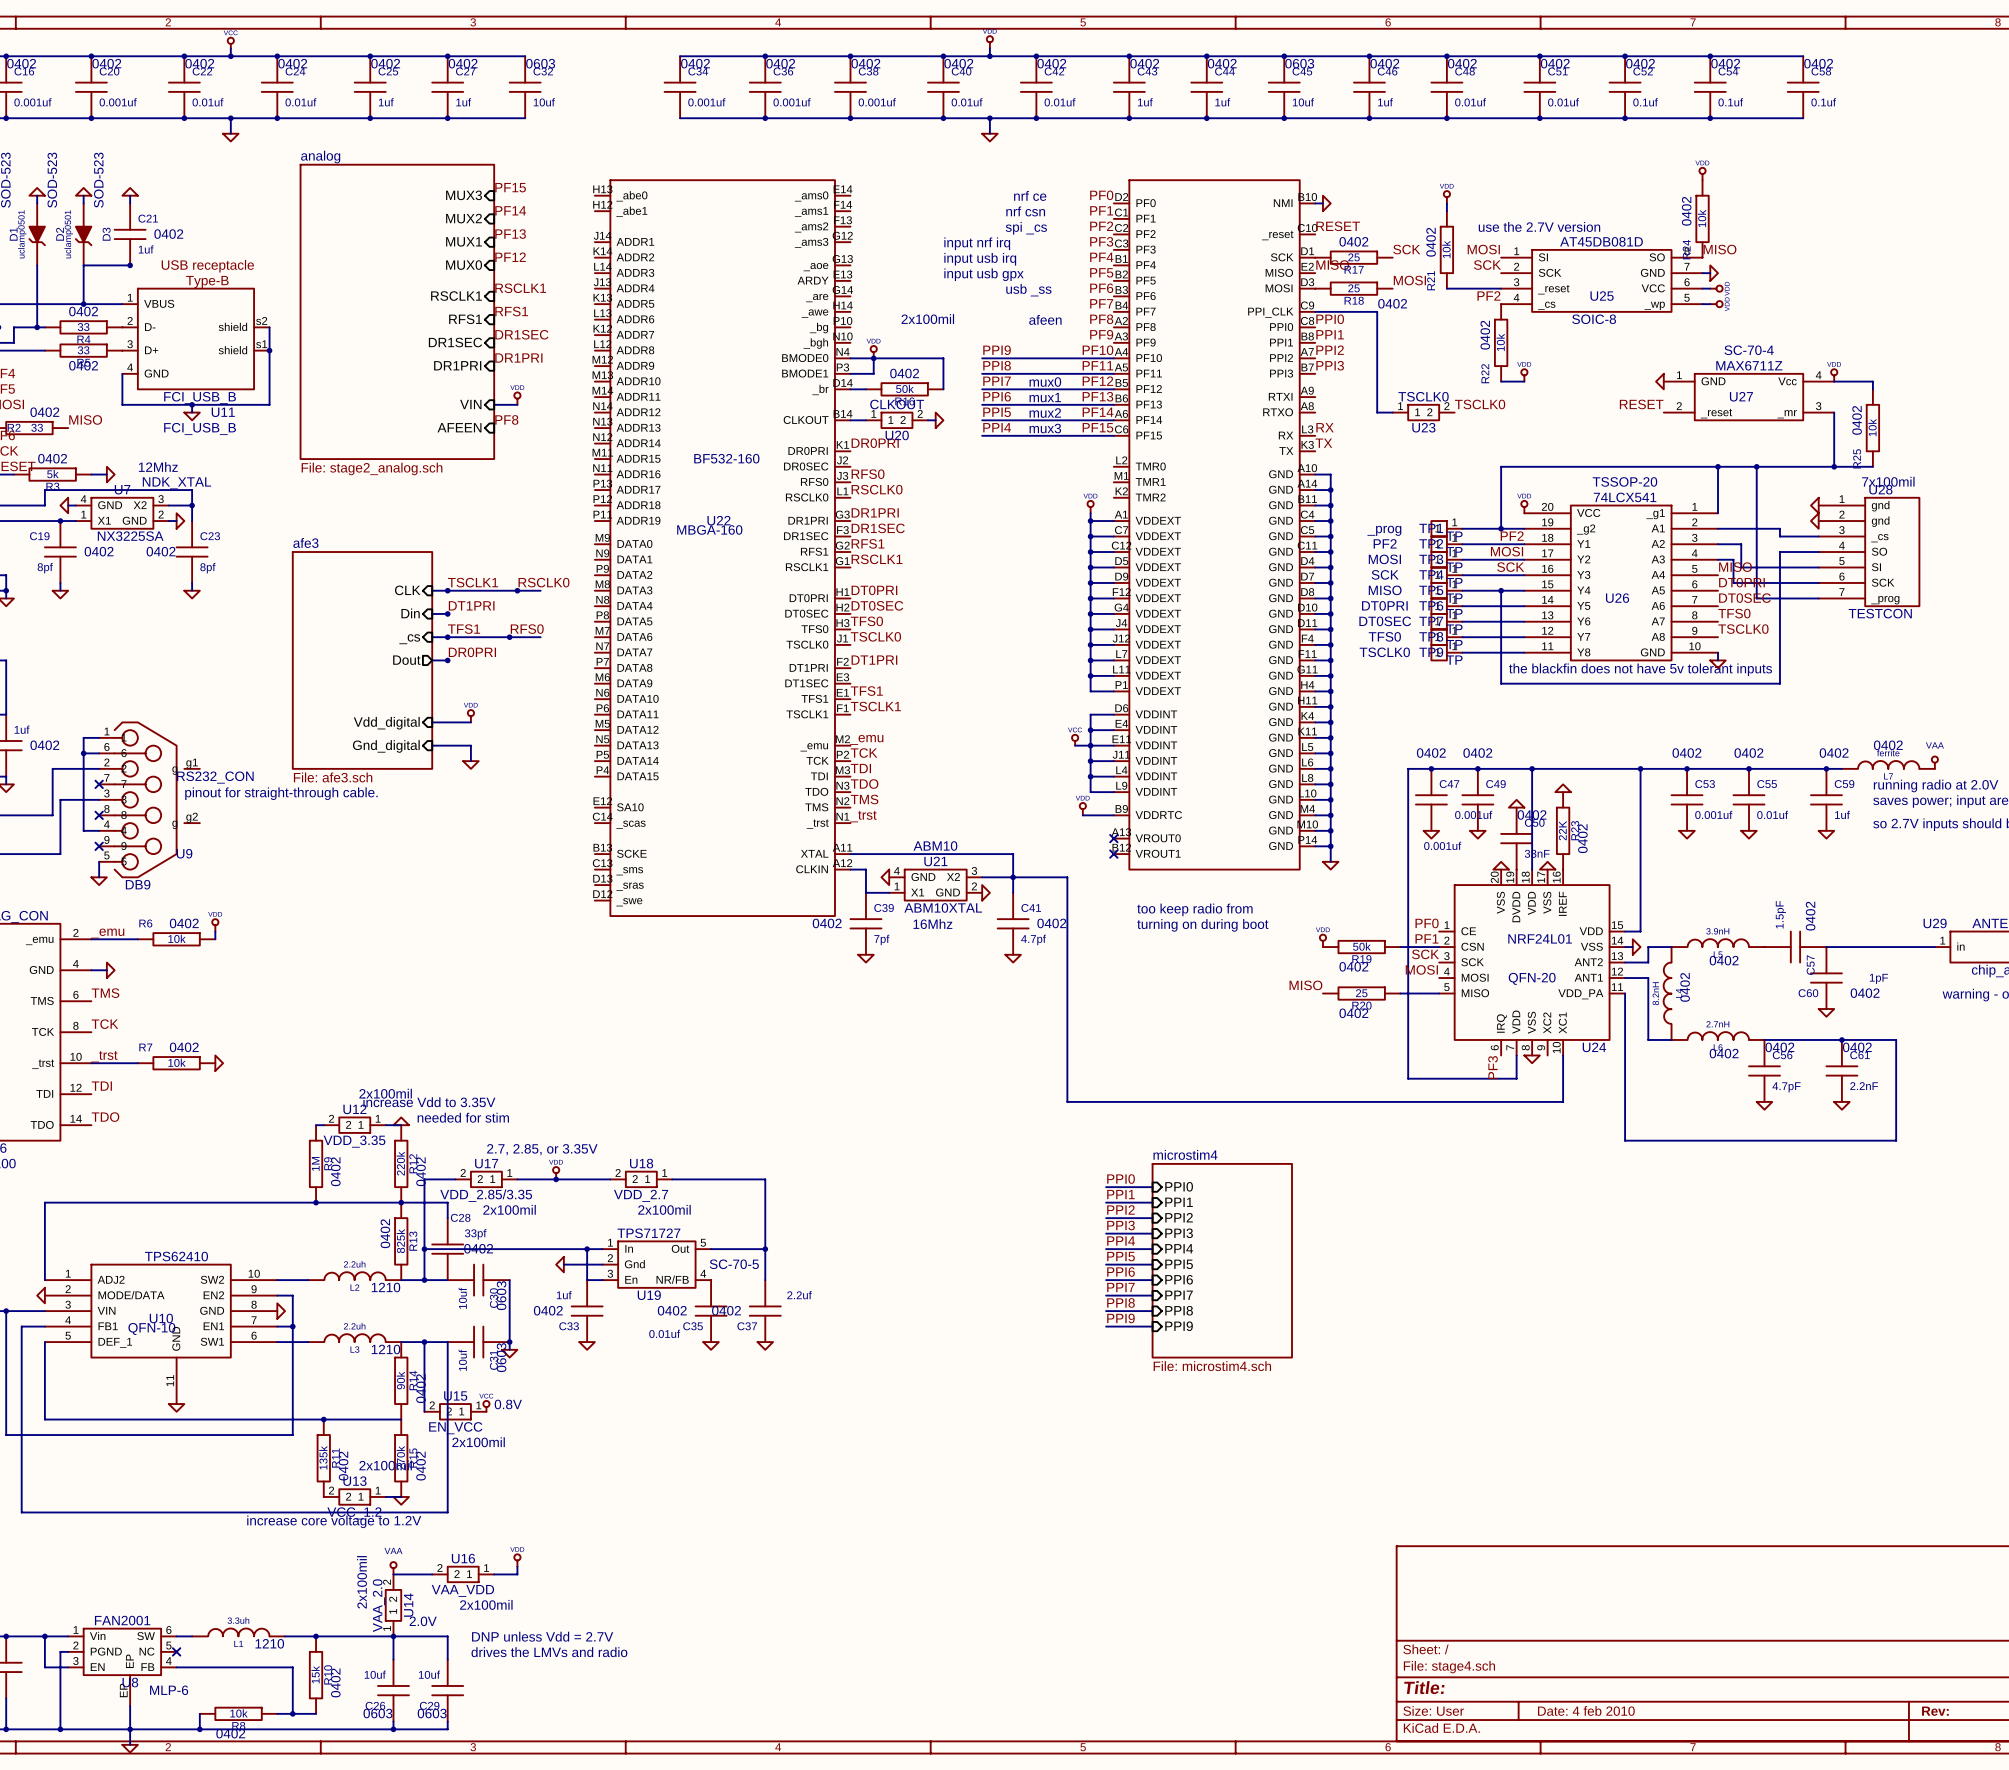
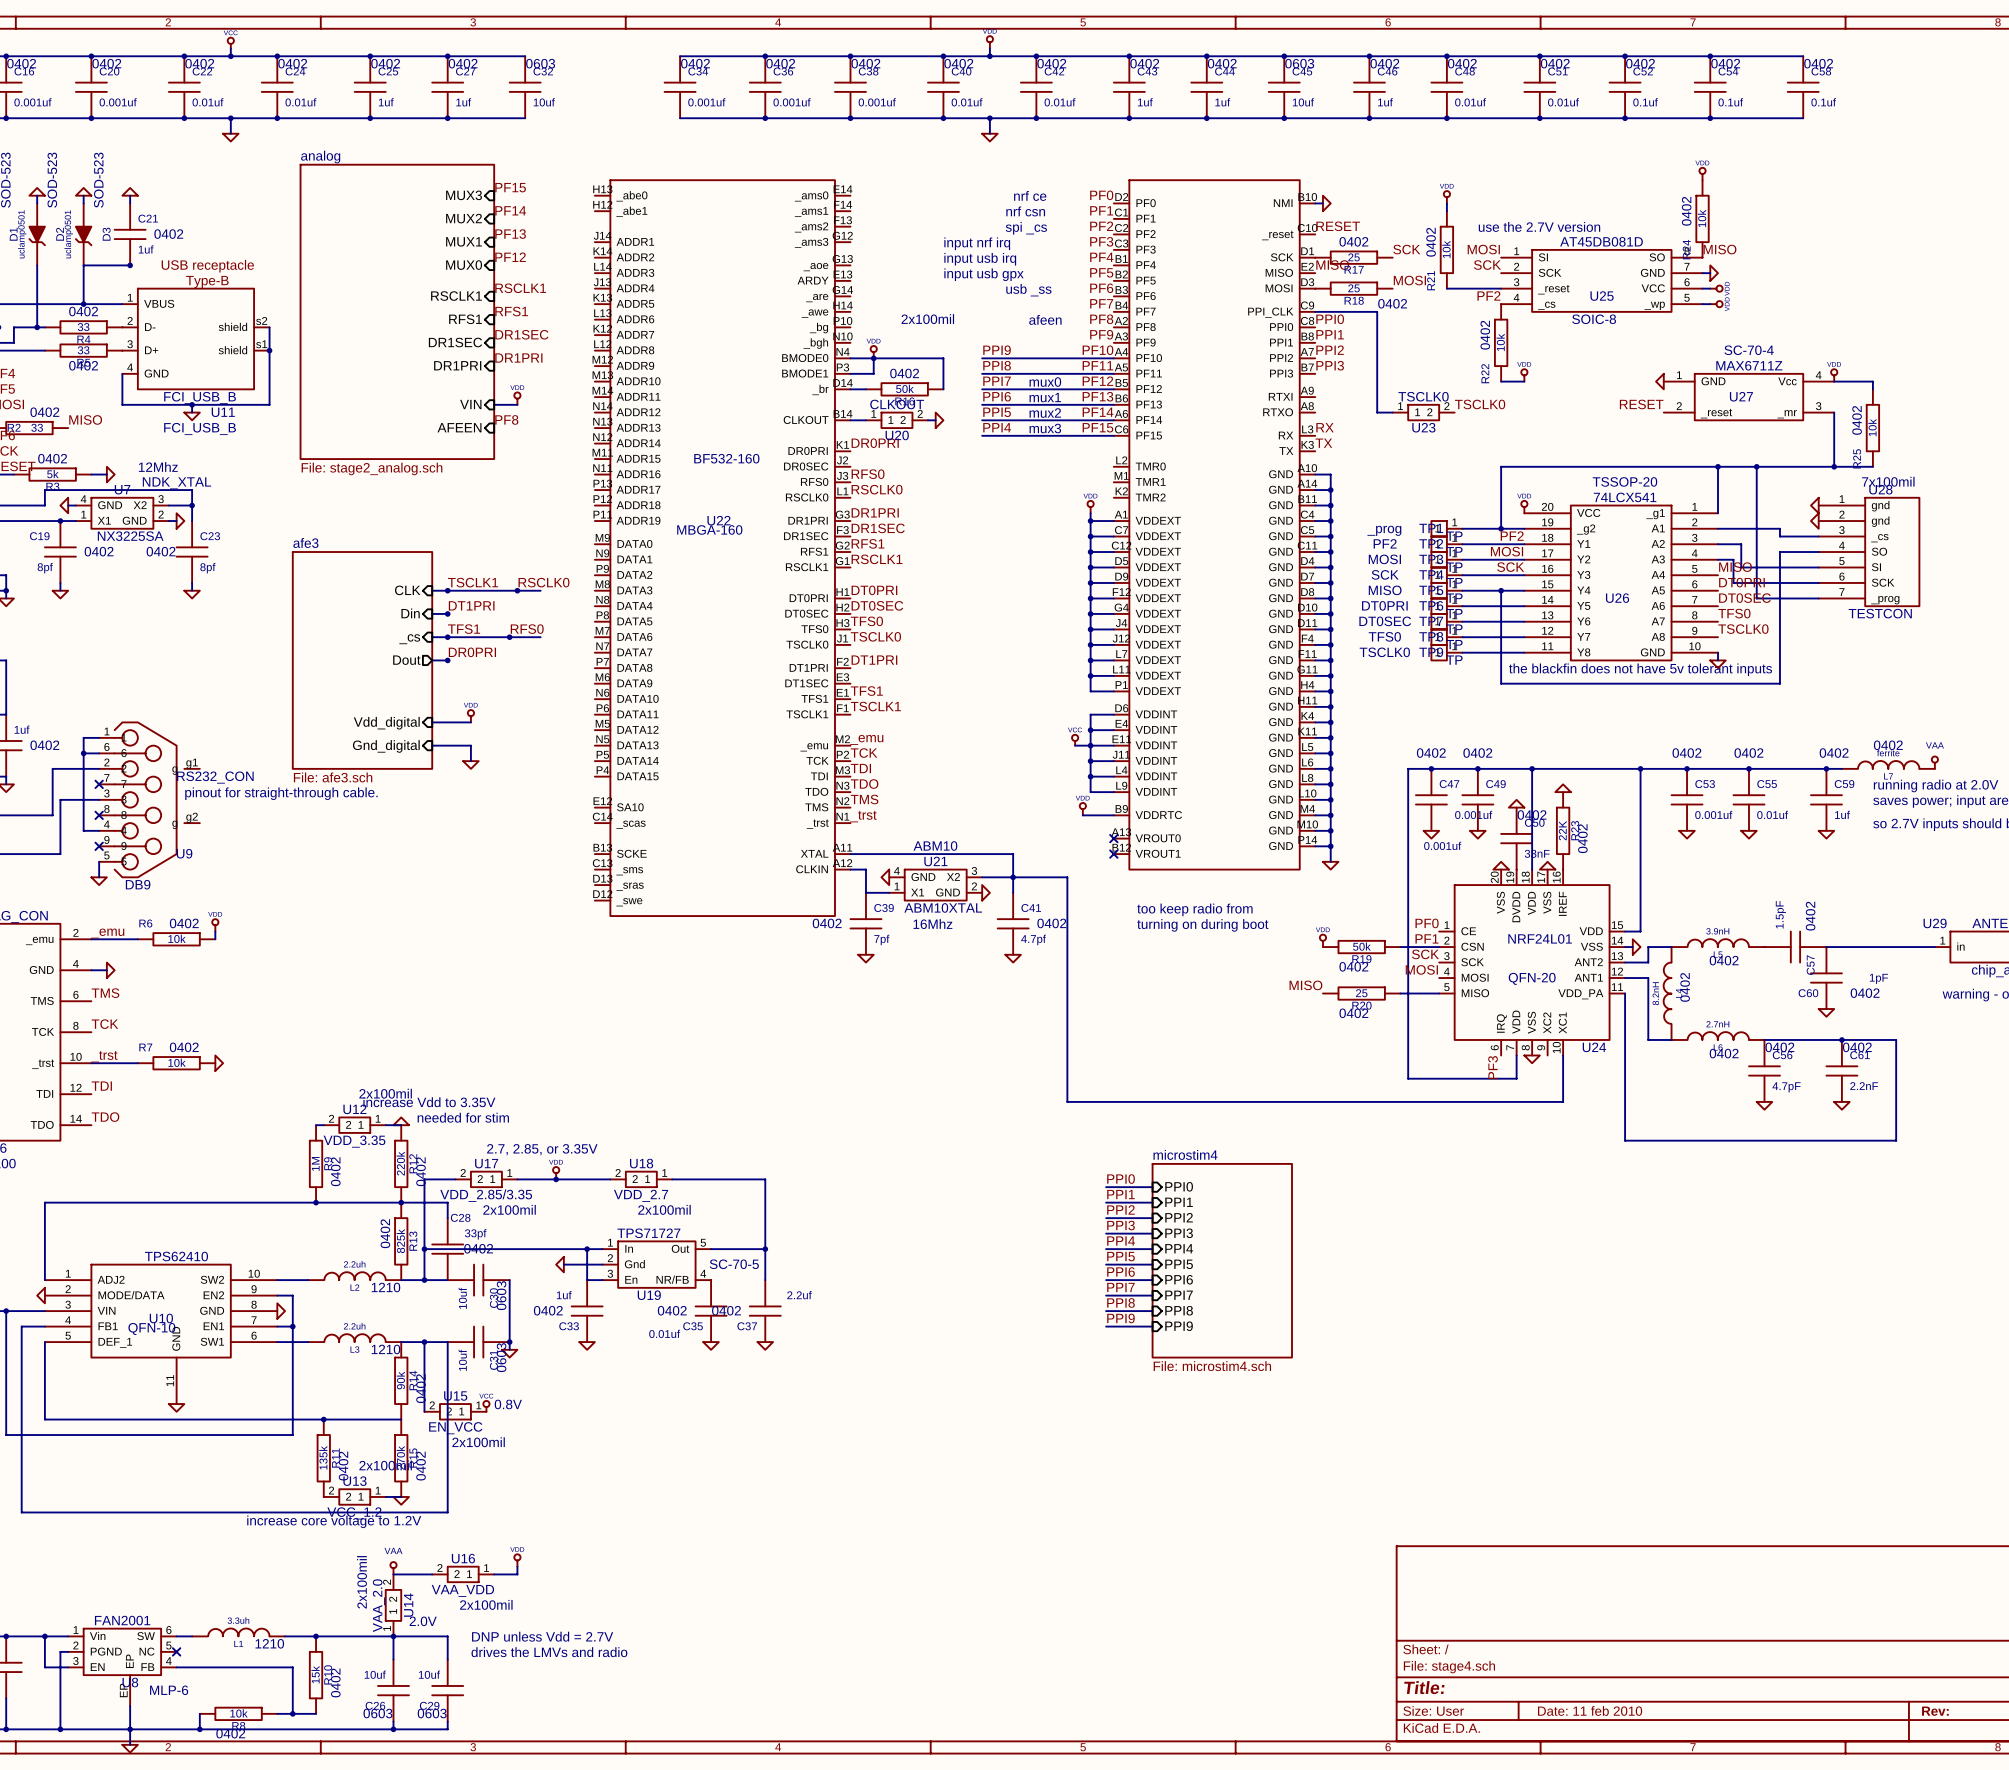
title block: Date: 4 feb 2010 (1586, 1710) -> Date: 11 feb 2010 (1590, 1710)

